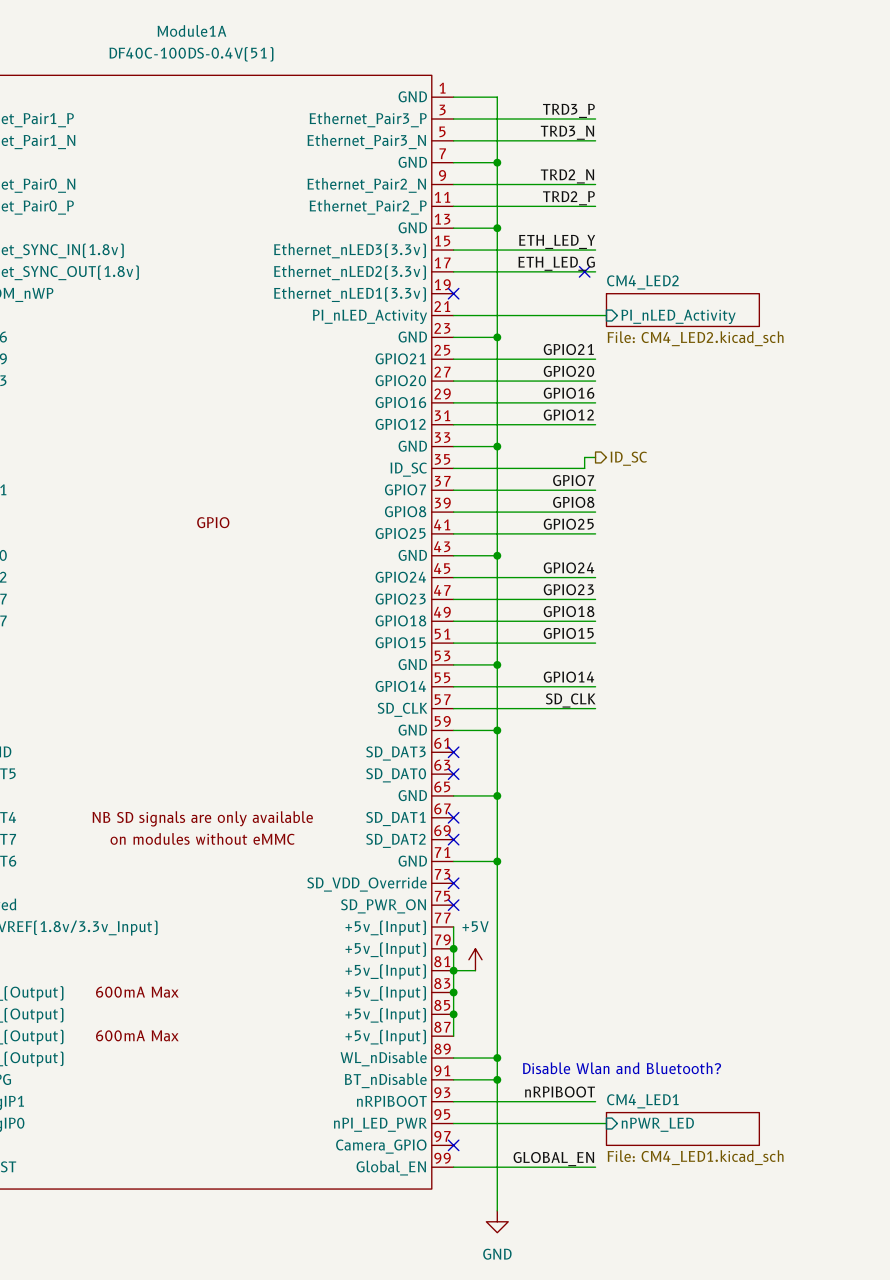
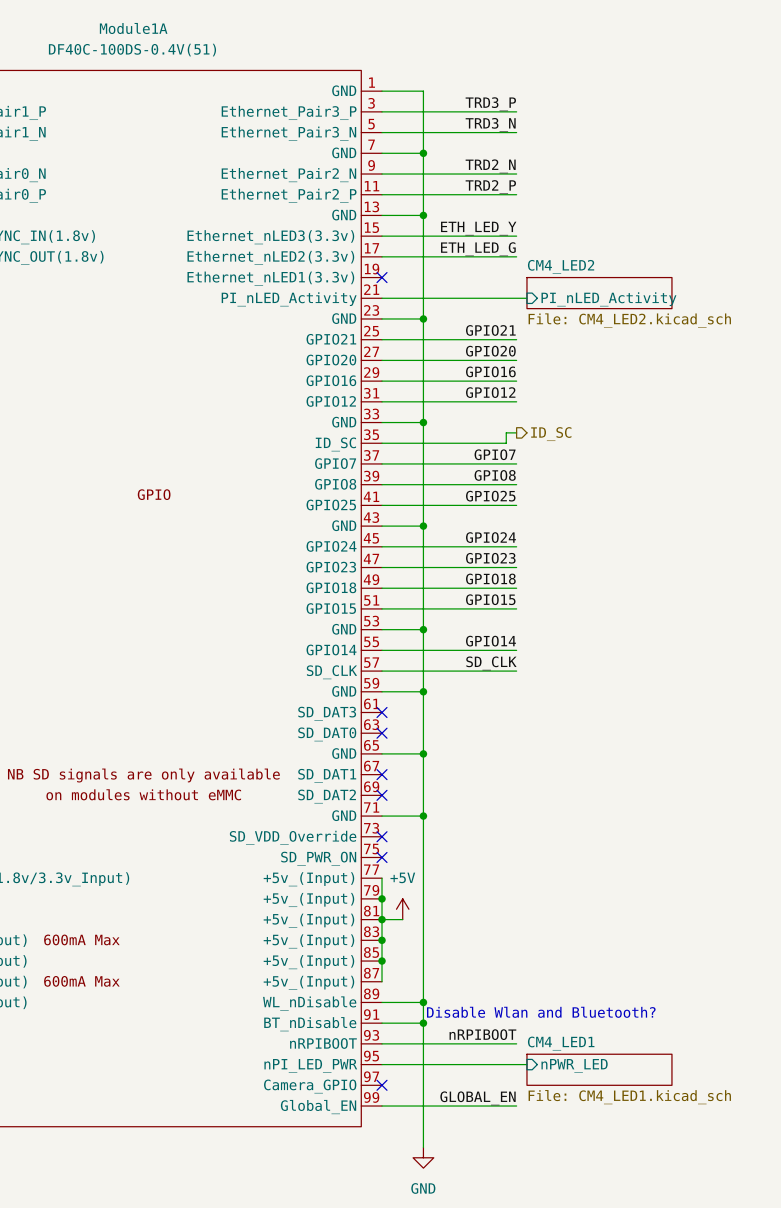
no-connect mark: (584, 271) -> none

